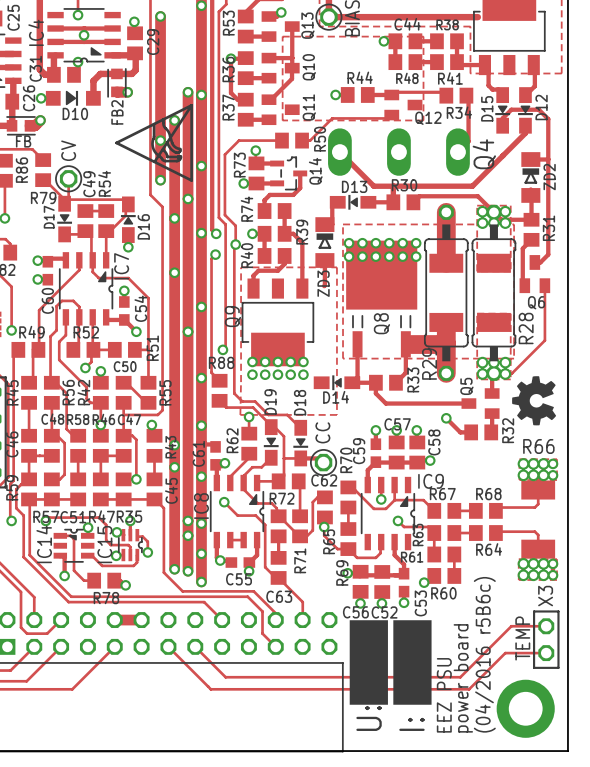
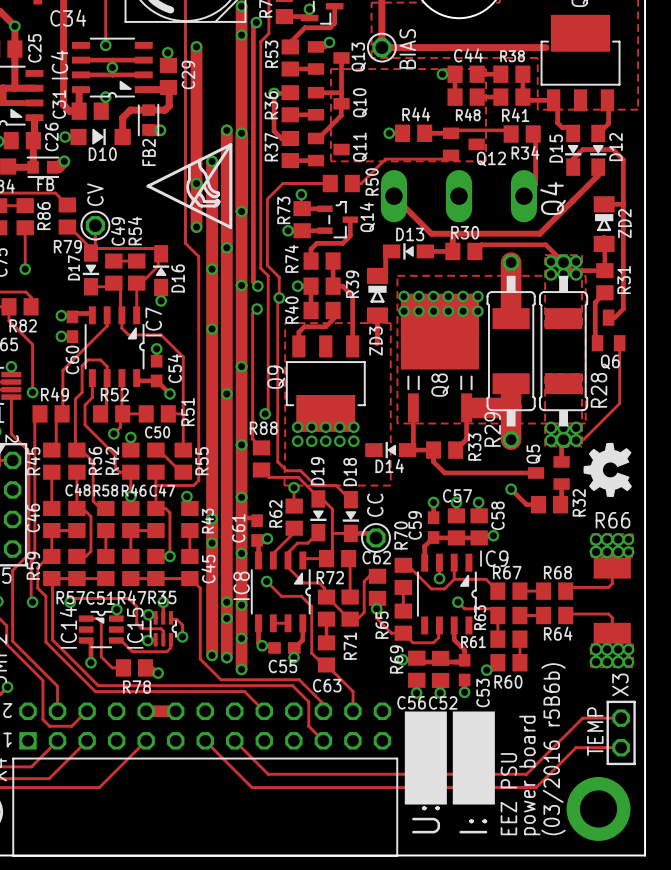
text: (04/2016 r5B6c) (484, 654) -> (03/2016 r5B6b) (553, 749)

